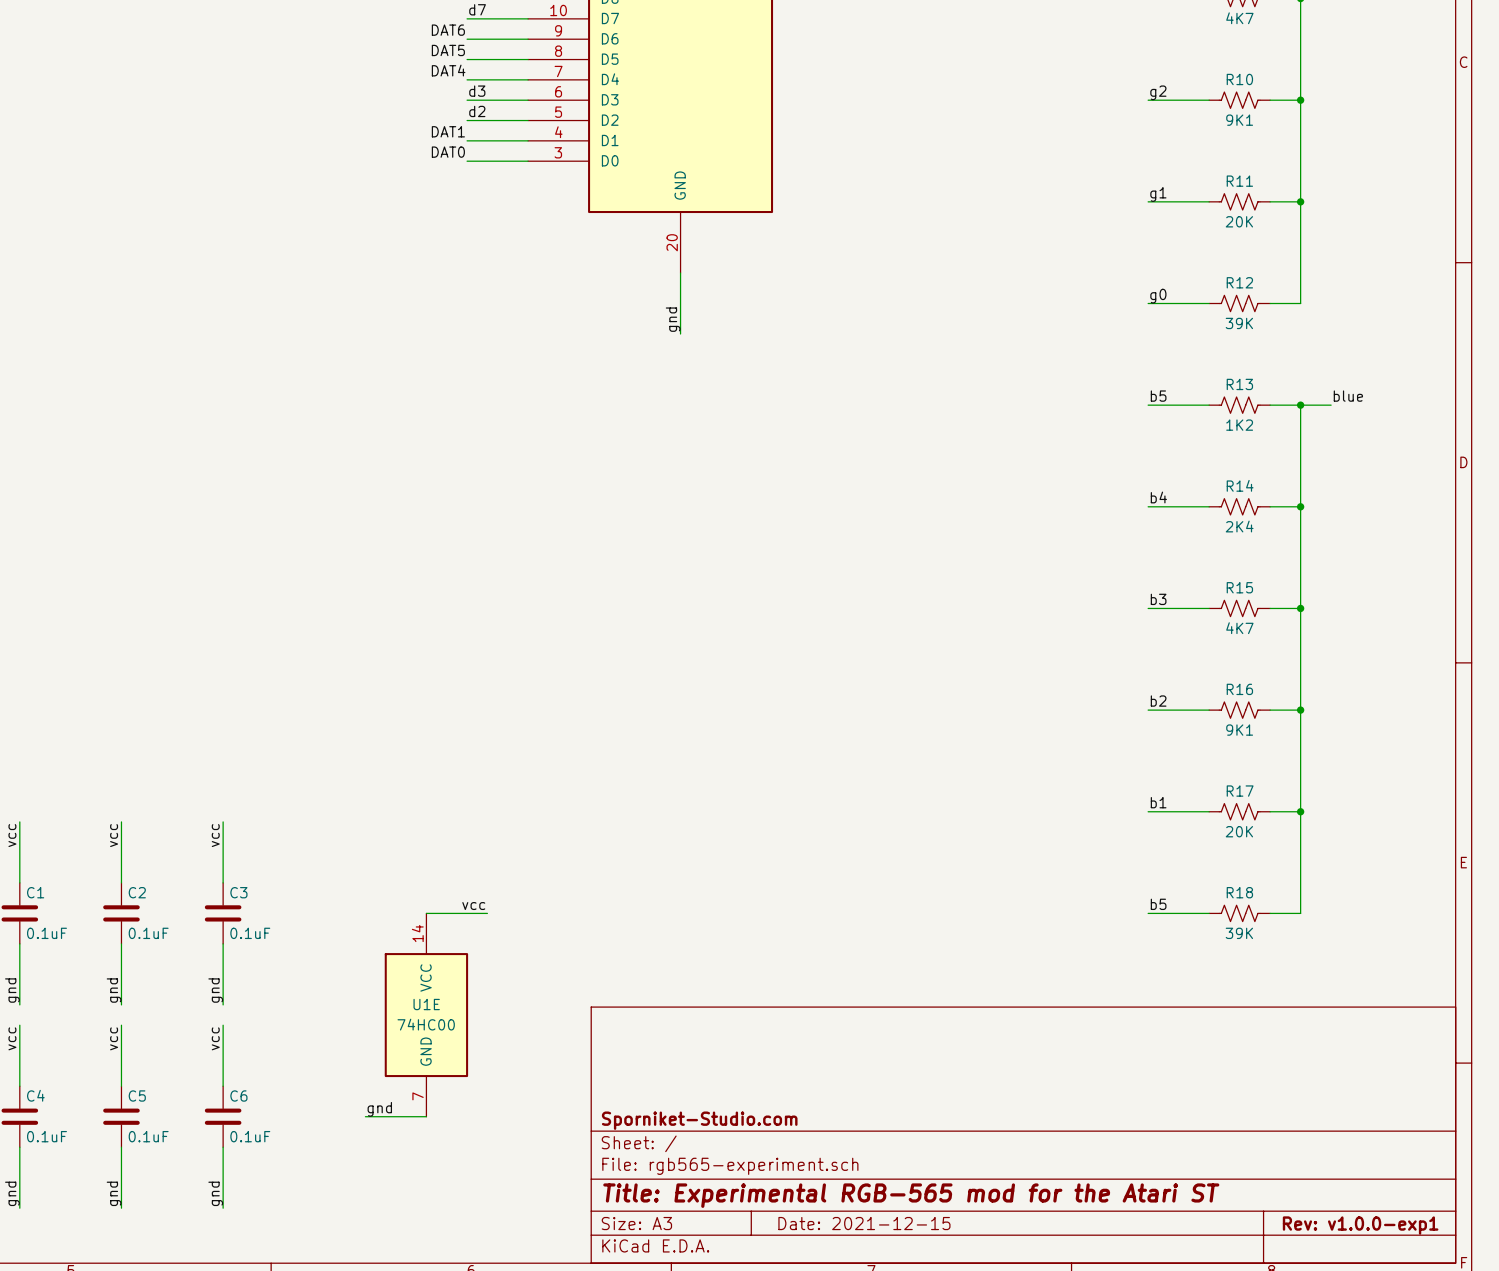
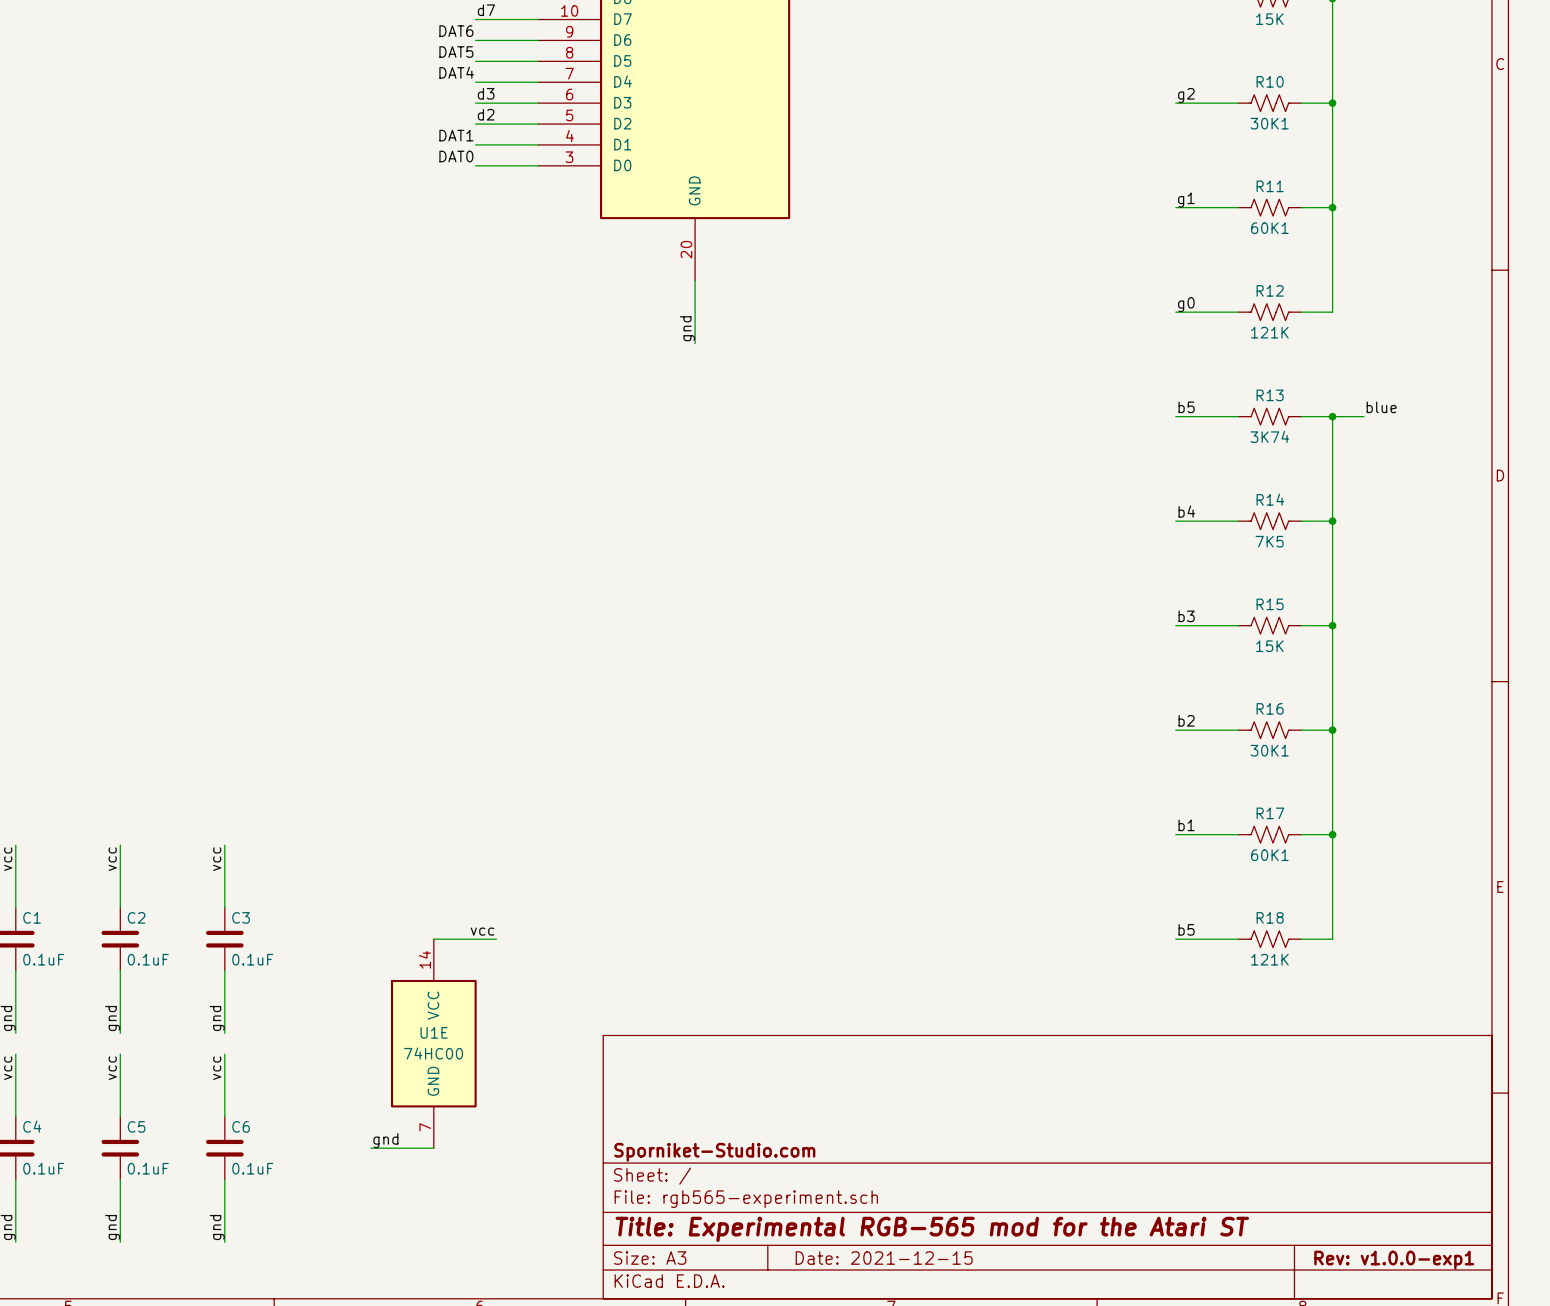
part value: 4K7 (1239, 18) -> 15K (1269, 19)
R10 value: 9K1 (1239, 120) -> 30K1 (1269, 123)
R11 value: 20K (1239, 221) -> 60K1 (1269, 228)
R12 value: 39K (1239, 323) -> 121K (1269, 332)
R13 value: 1K2 (1239, 425) -> 3K74 (1269, 436)
R14 value: 2K4 (1239, 526) -> 7K5 (1269, 541)
R15 value: 4K7 (1239, 628) -> 15K (1269, 646)
R16 value: 9K1 (1239, 730) -> 30K1 (1269, 750)
R17 value: 20K (1239, 831) -> 60K1 (1269, 855)
R18 value: 39K (1239, 933) -> 121K (1269, 959)

